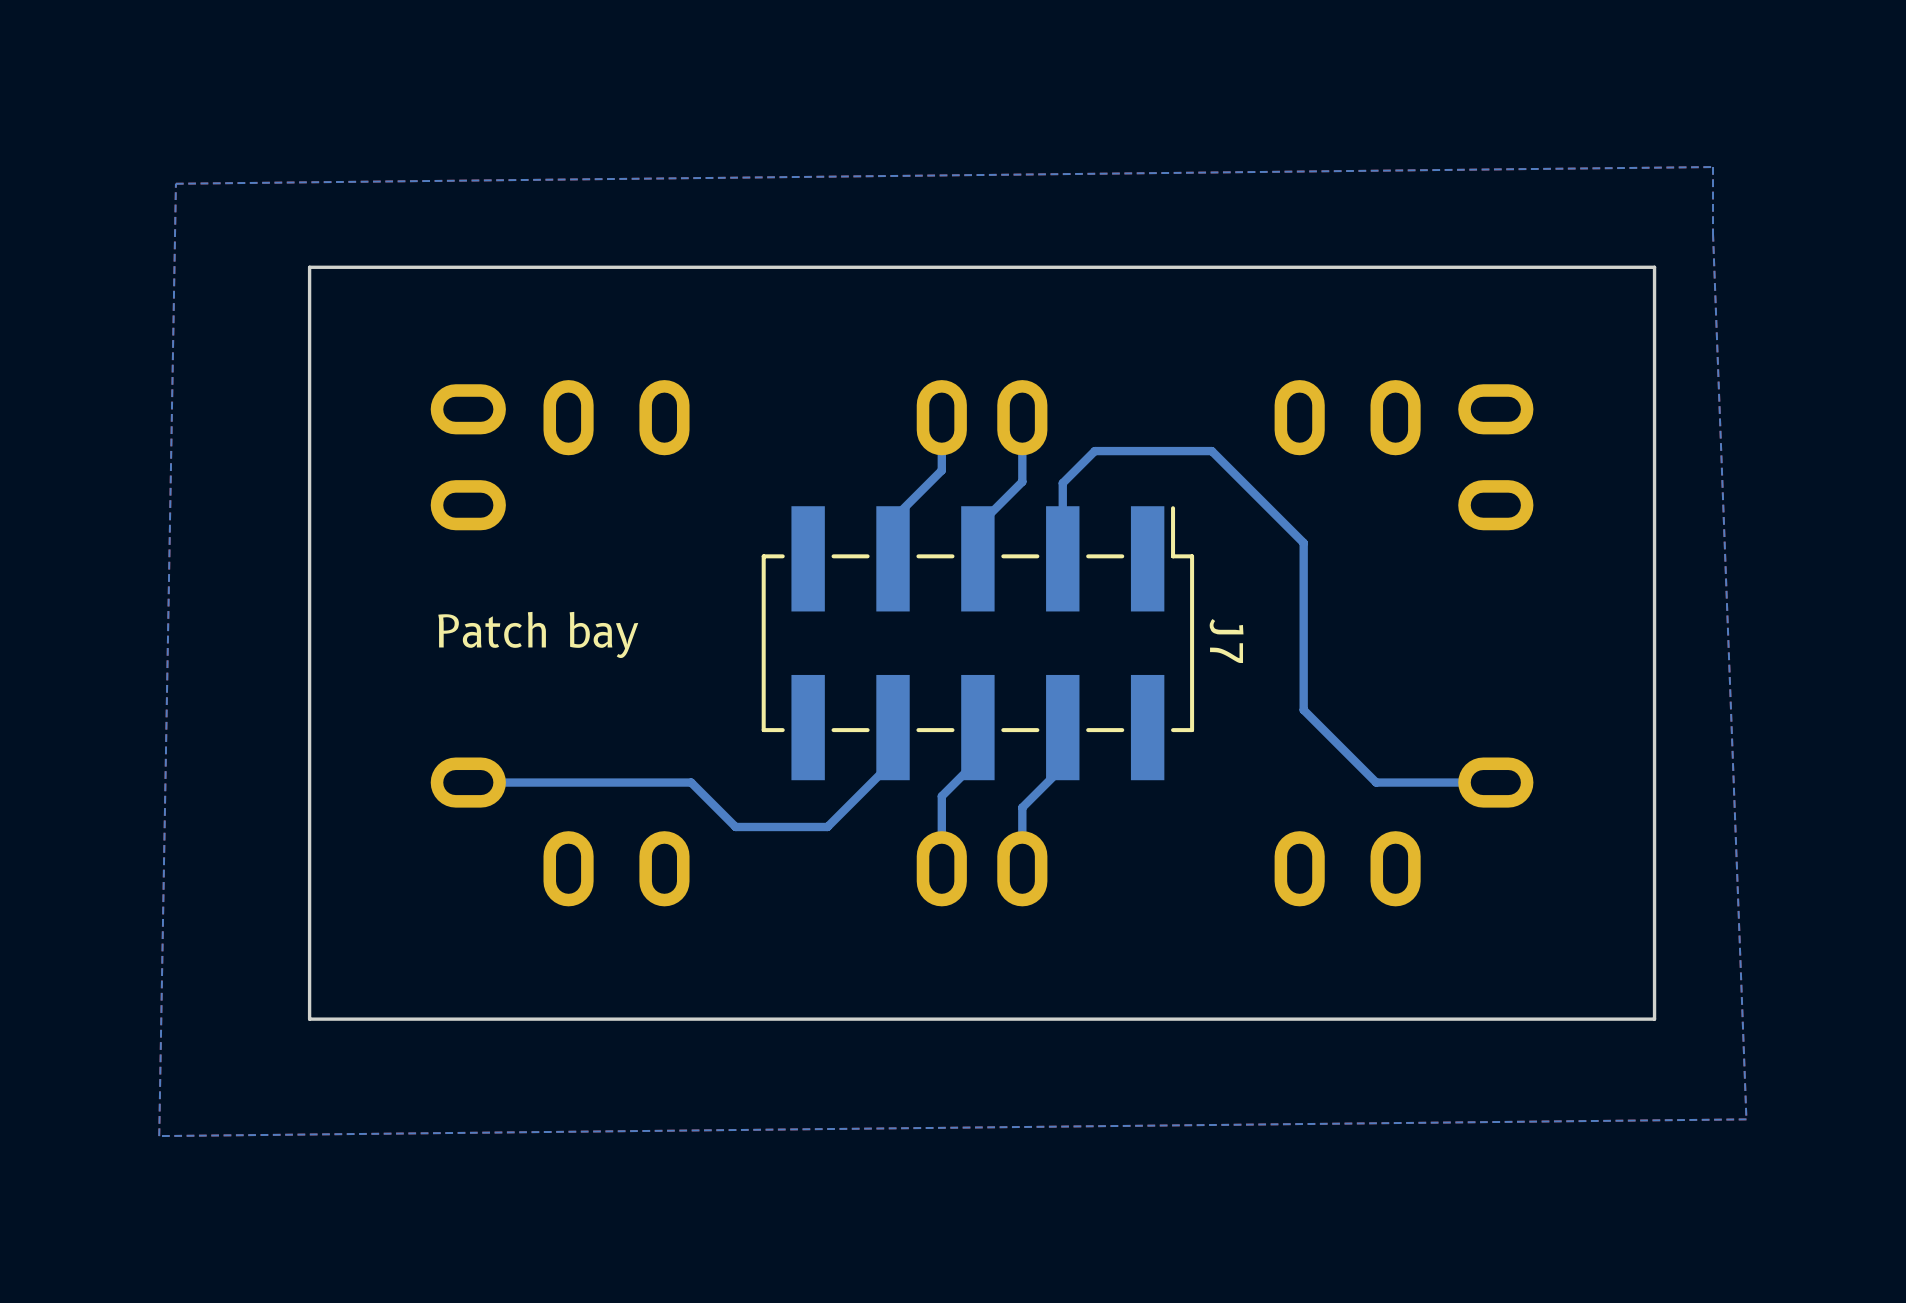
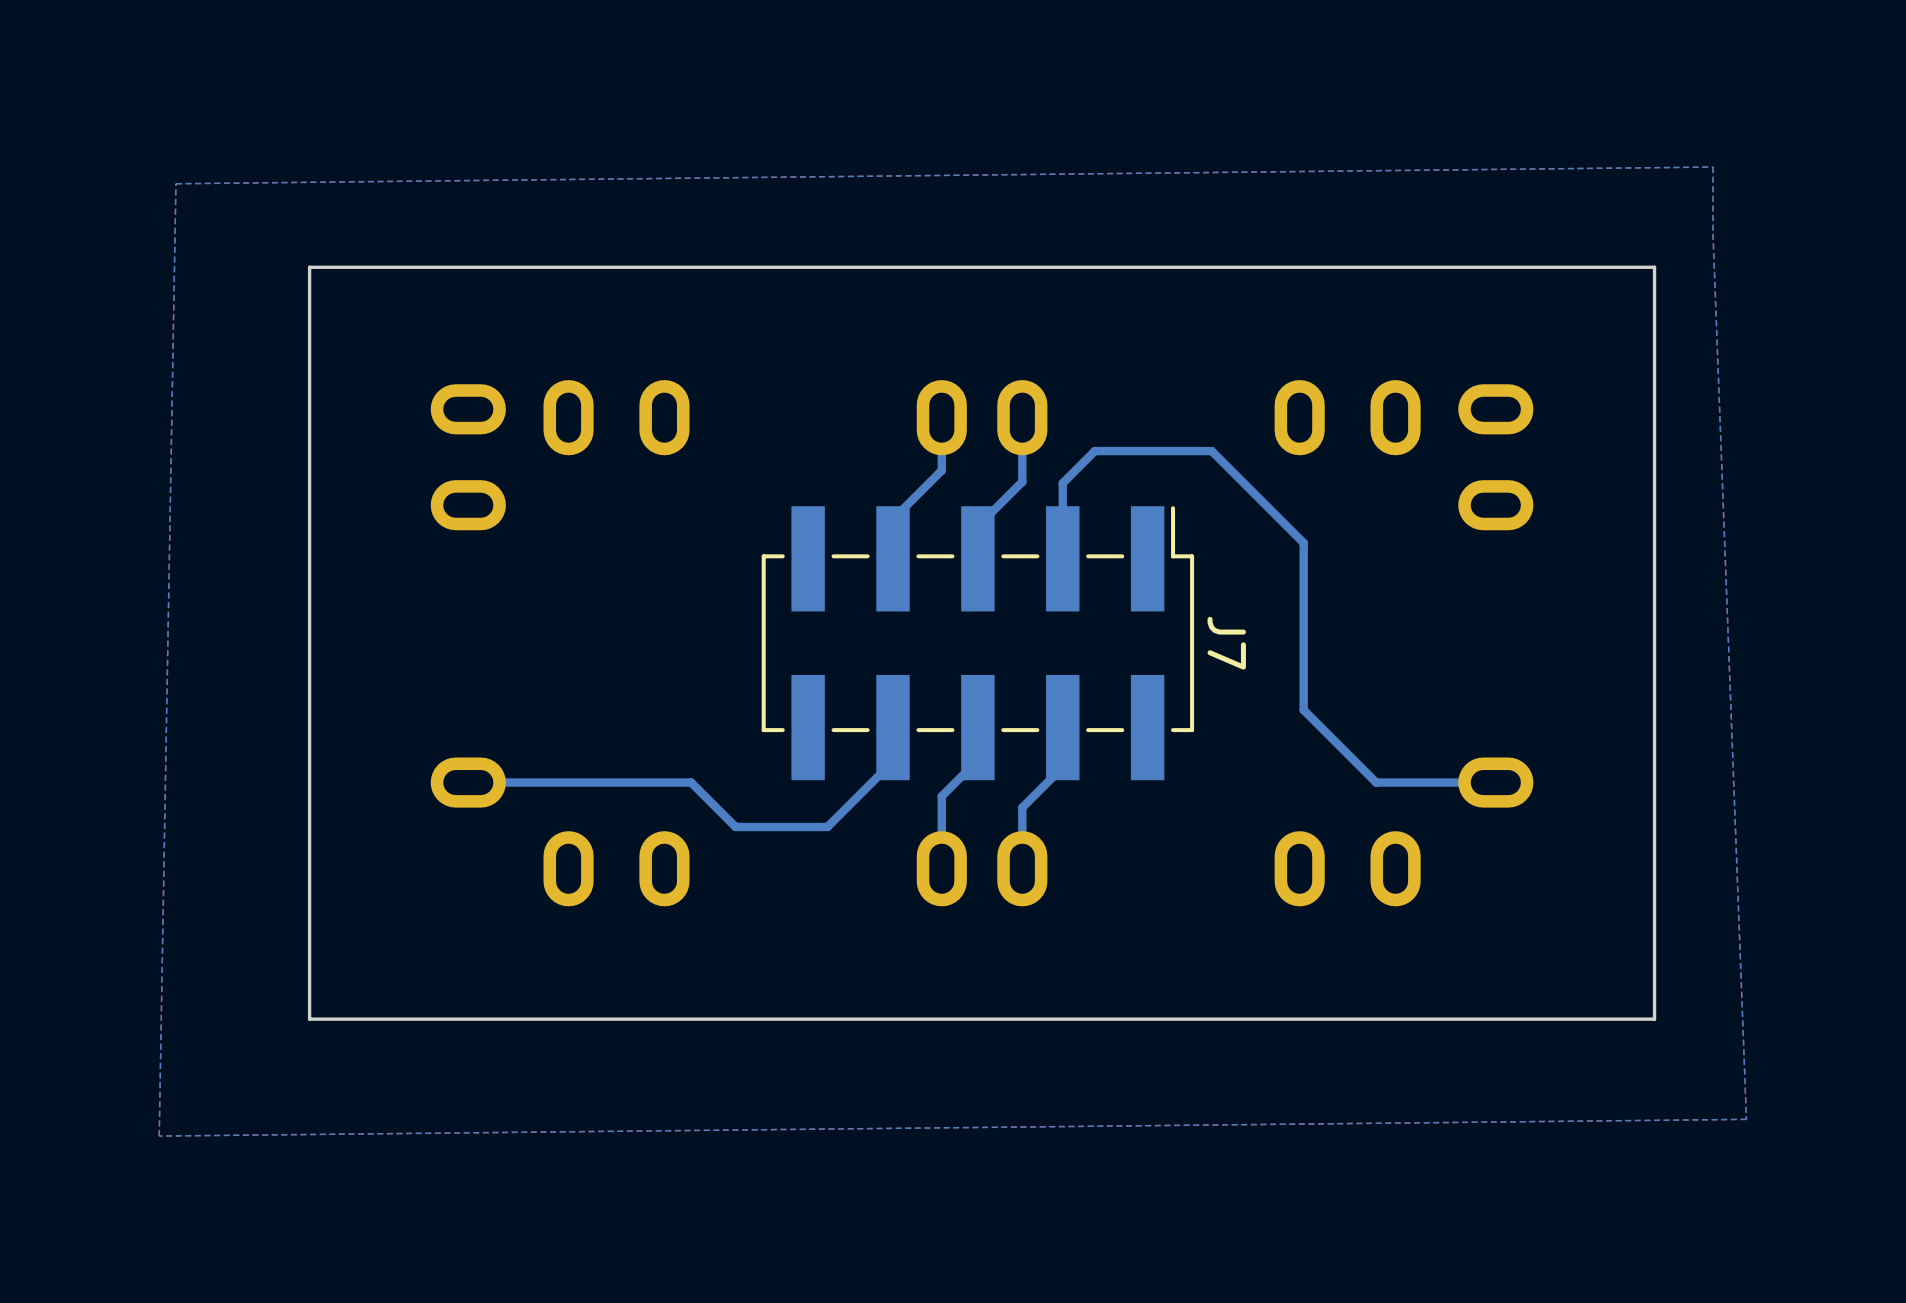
text: Patch bay (538, 634) -> none

